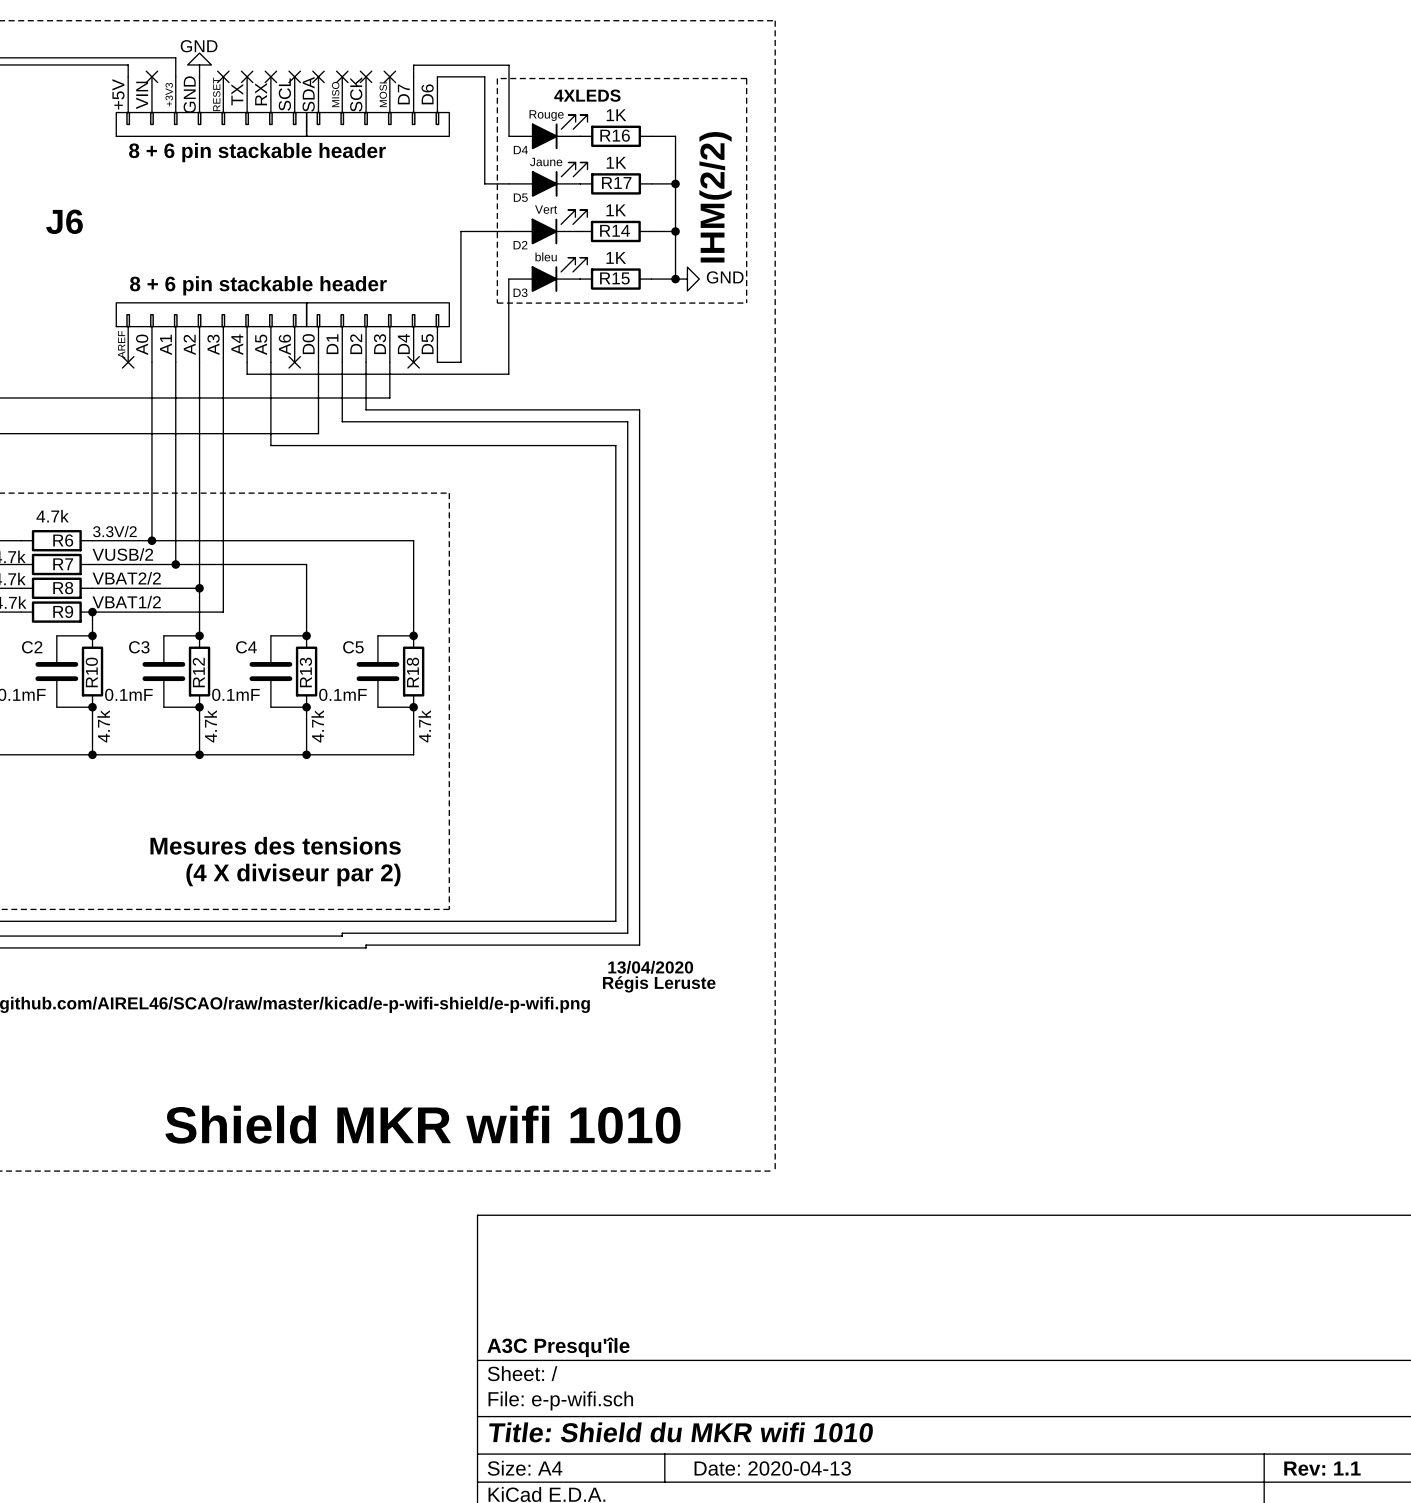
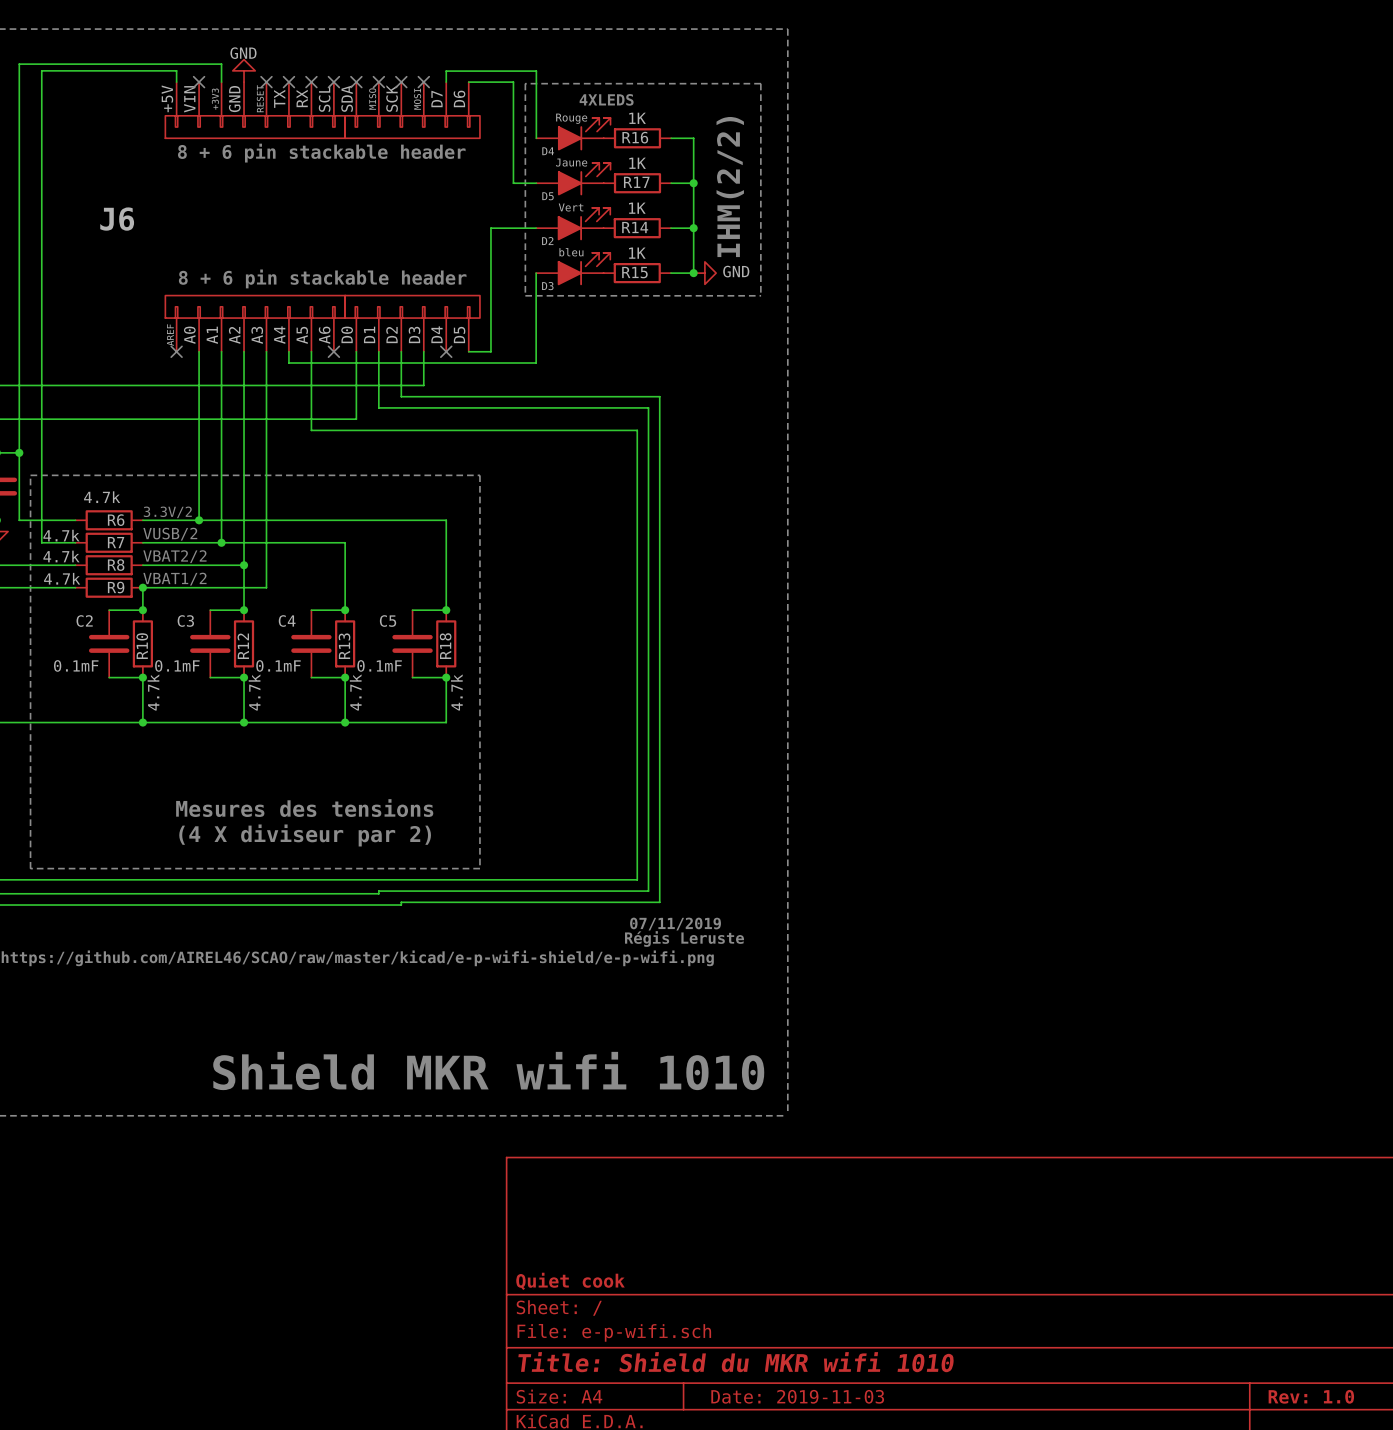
text: 13/04/2020 (650, 967) -> 07/11/2019 (675, 924)
title block: A3C Presqu'île (558, 1347) -> Quiet cook (570, 1281)
title block: Date: 2020-04-13 (772, 1468) -> Date: 2019-11-03 (797, 1396)
title block: Rev: 1.1 (1322, 1468) -> Rev: 1.0 (1311, 1396)

